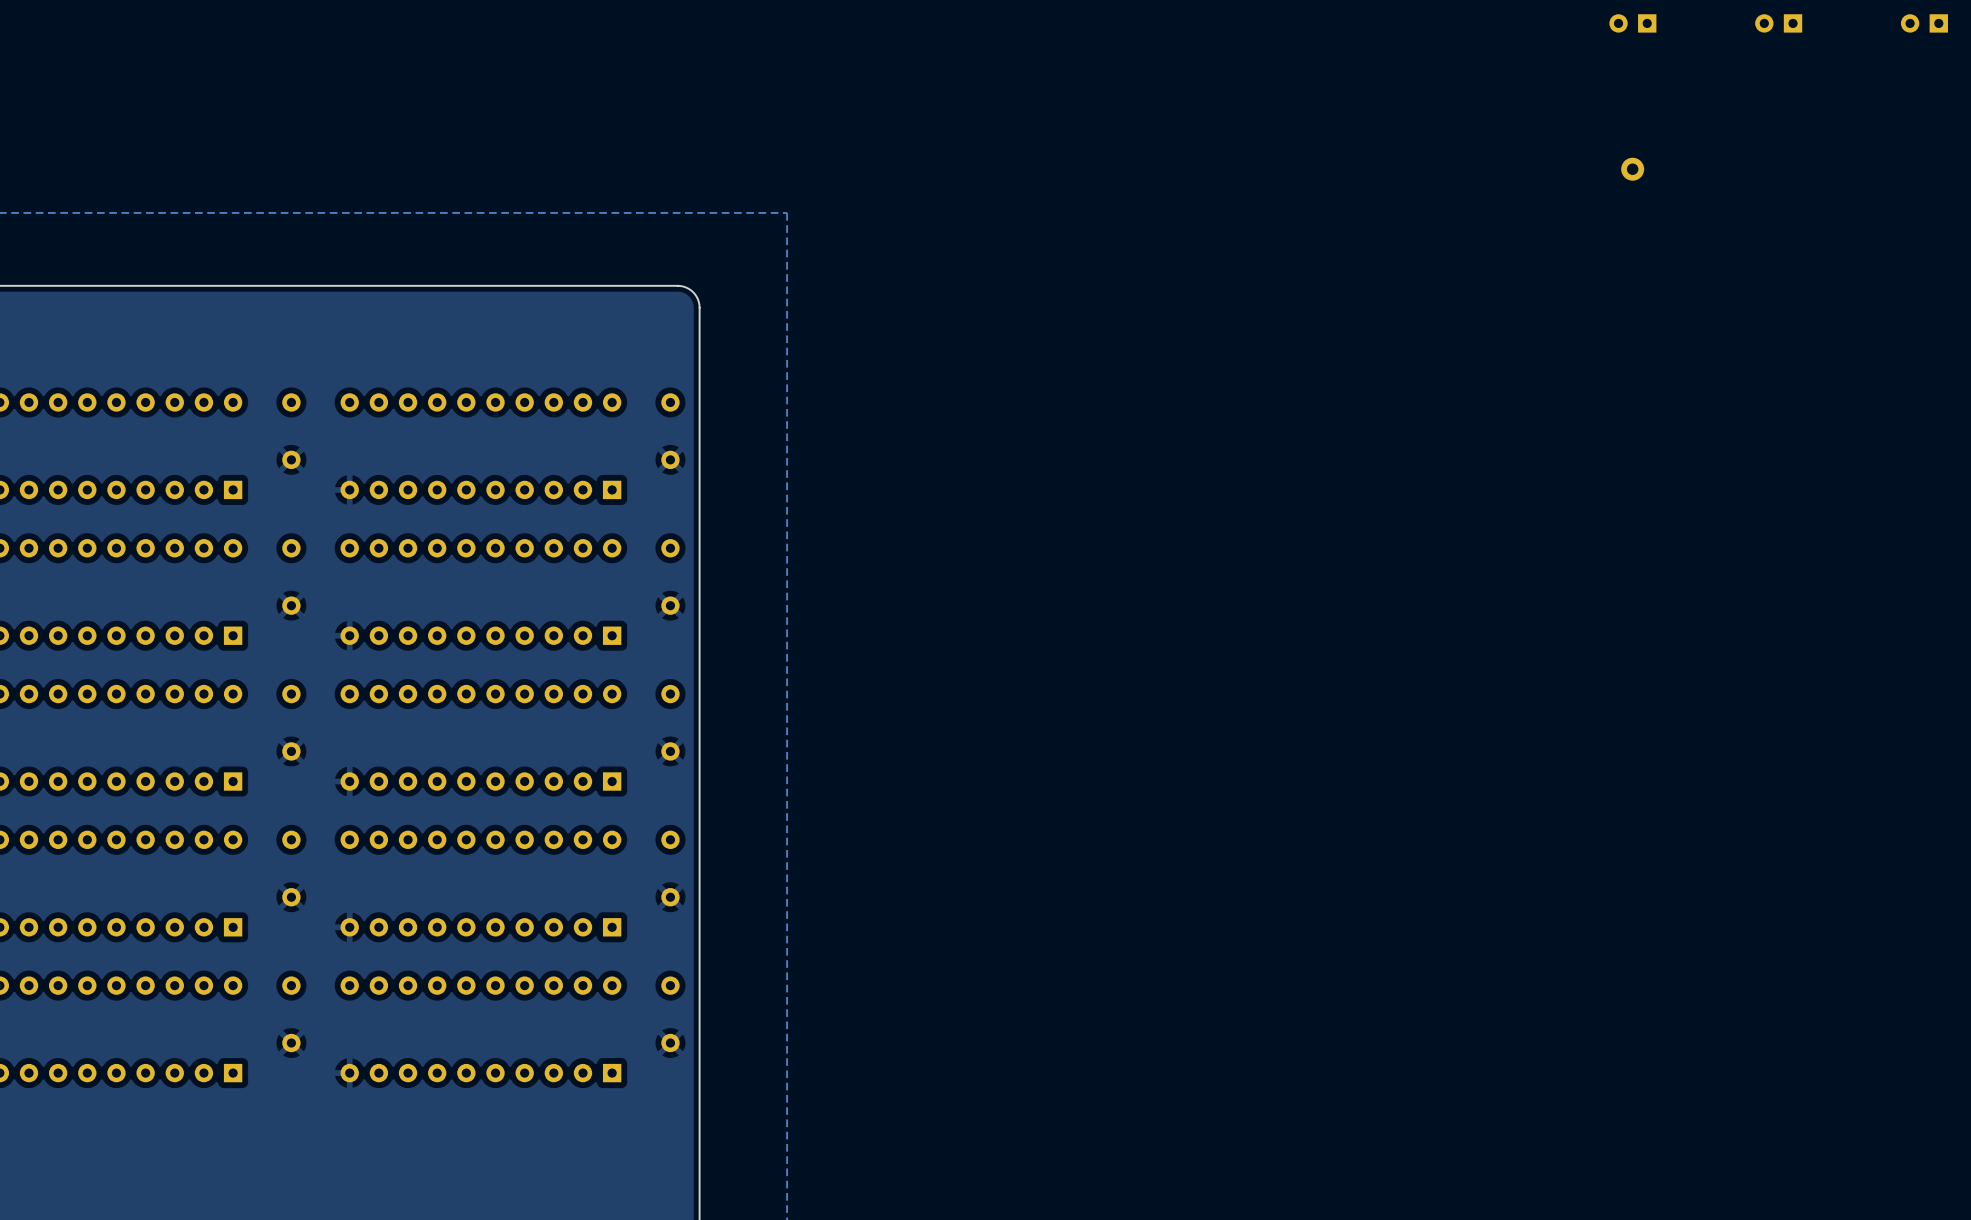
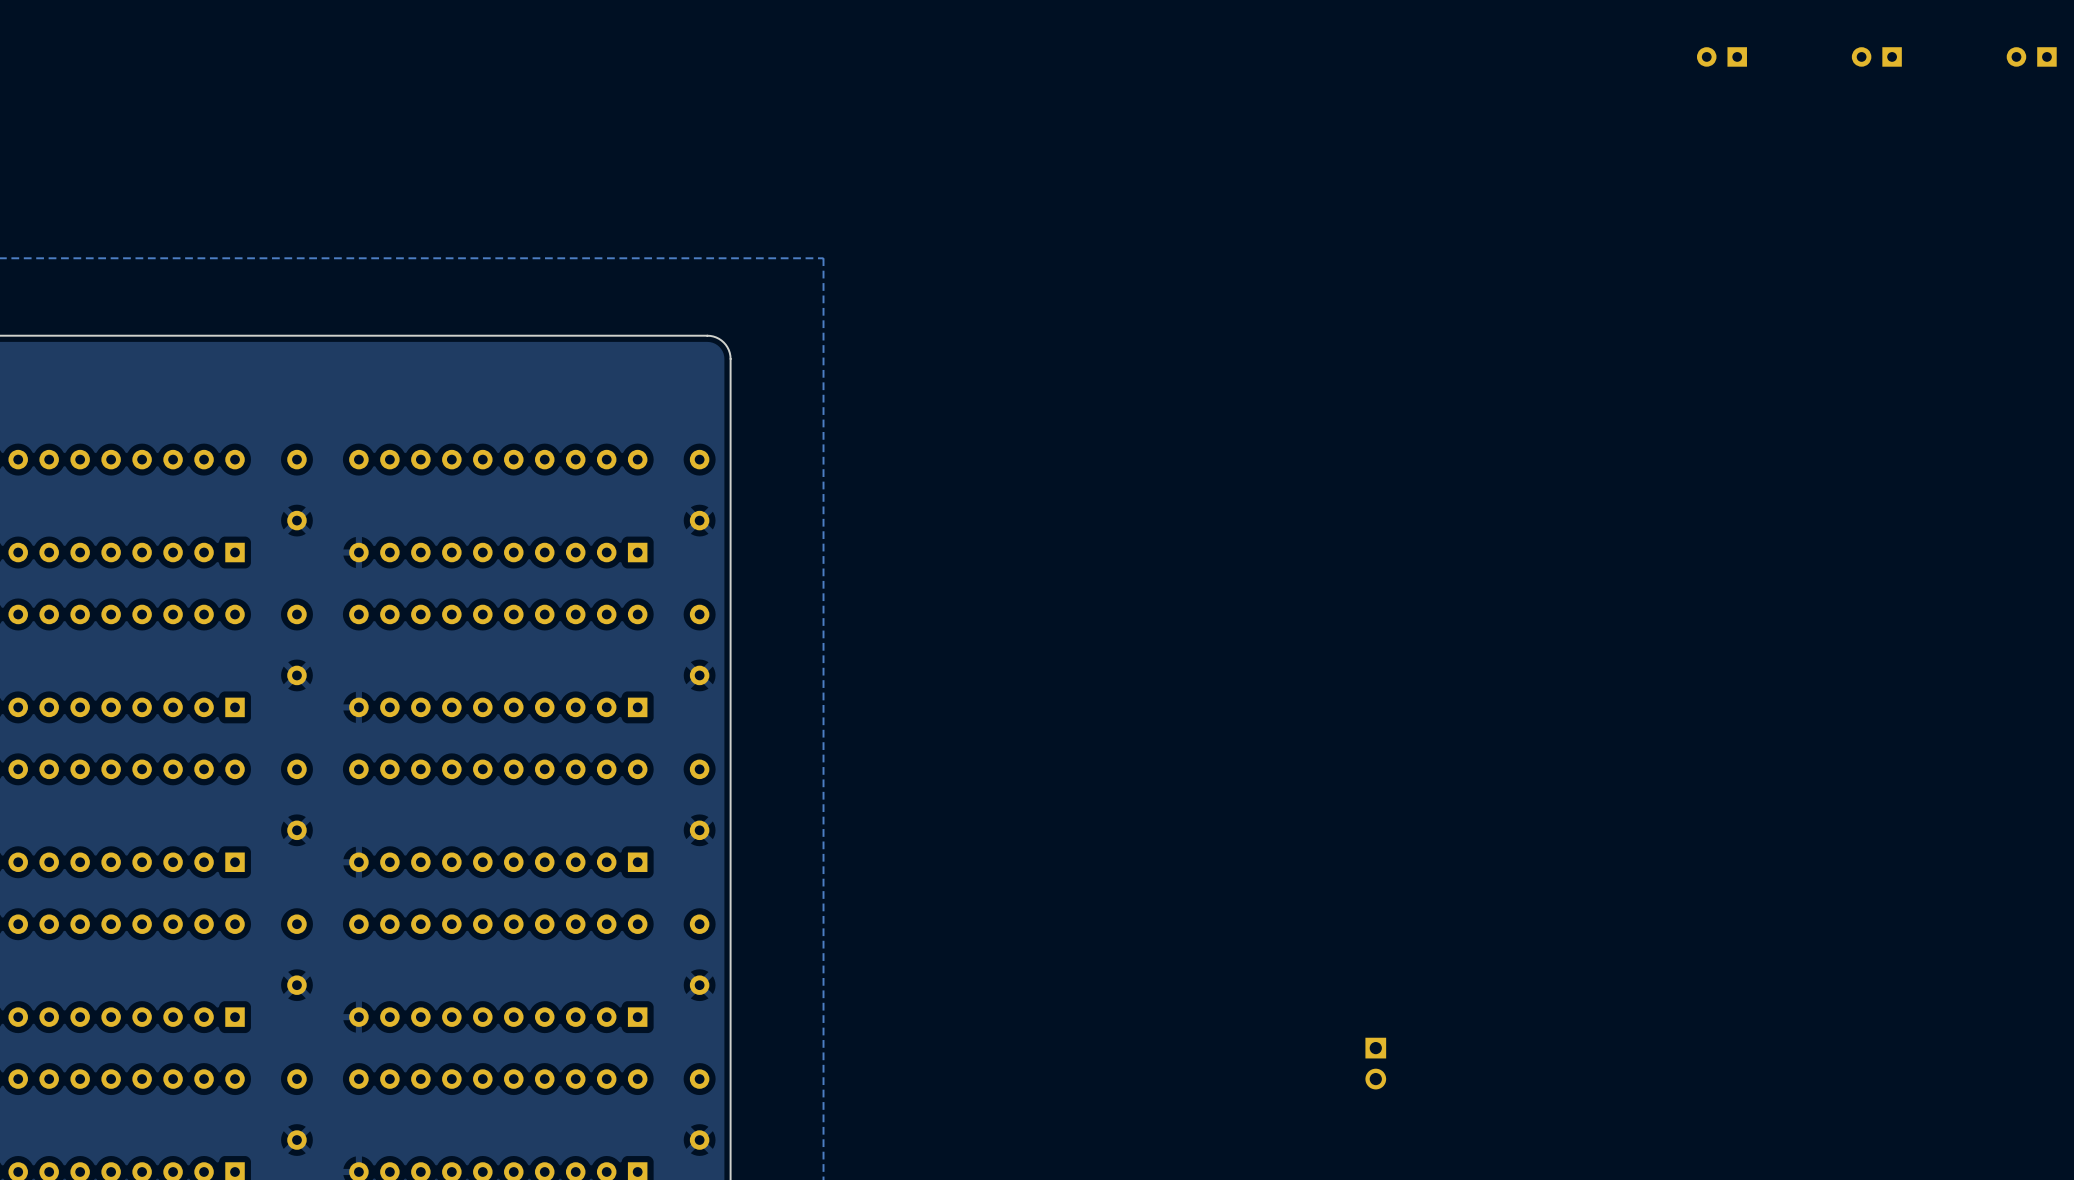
part: (1632, 169) -> none
part: none -> (1375, 1063)

